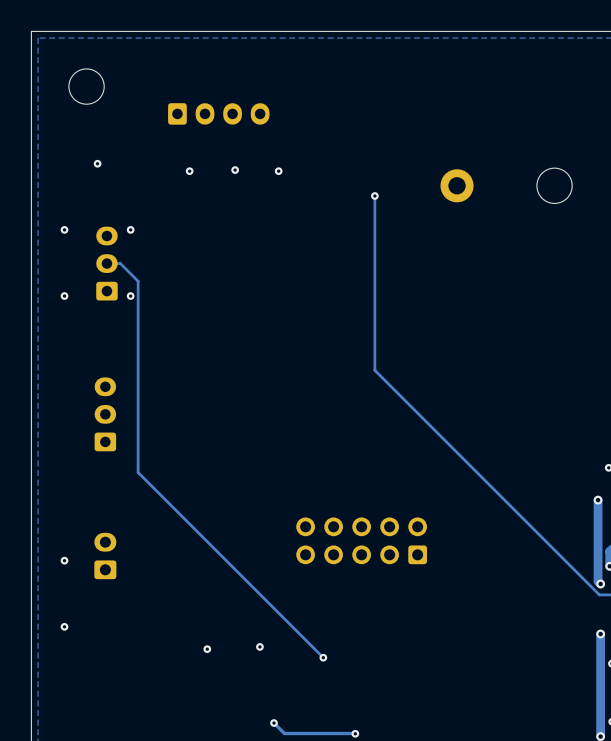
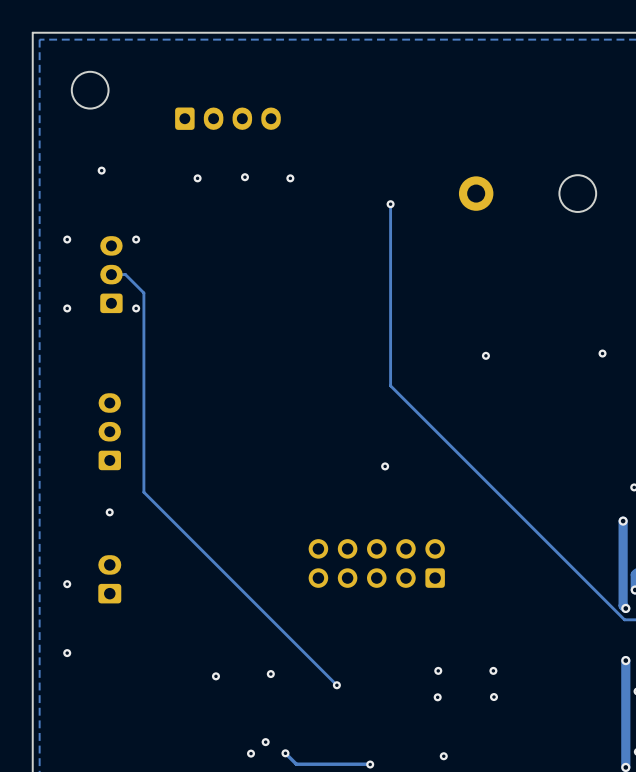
via: none -> (602, 353)
via: none -> (485, 355)
via: none -> (385, 466)
via: none -> (109, 512)
via: none -> (438, 670)
via: none -> (493, 670)
via: none -> (437, 697)
via: none -> (493, 697)
via: none -> (265, 742)
via: none -> (251, 753)
via: none -> (443, 756)

